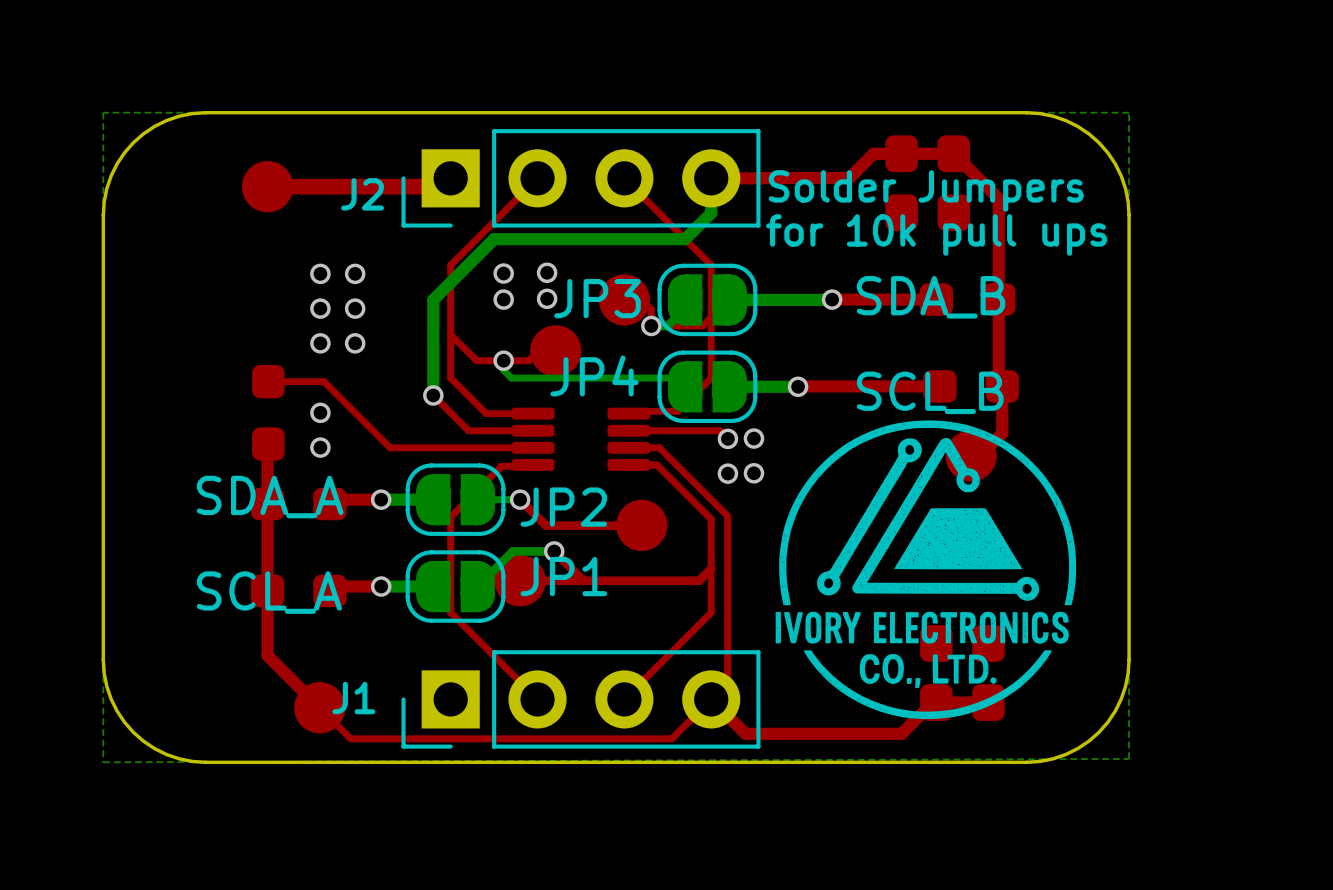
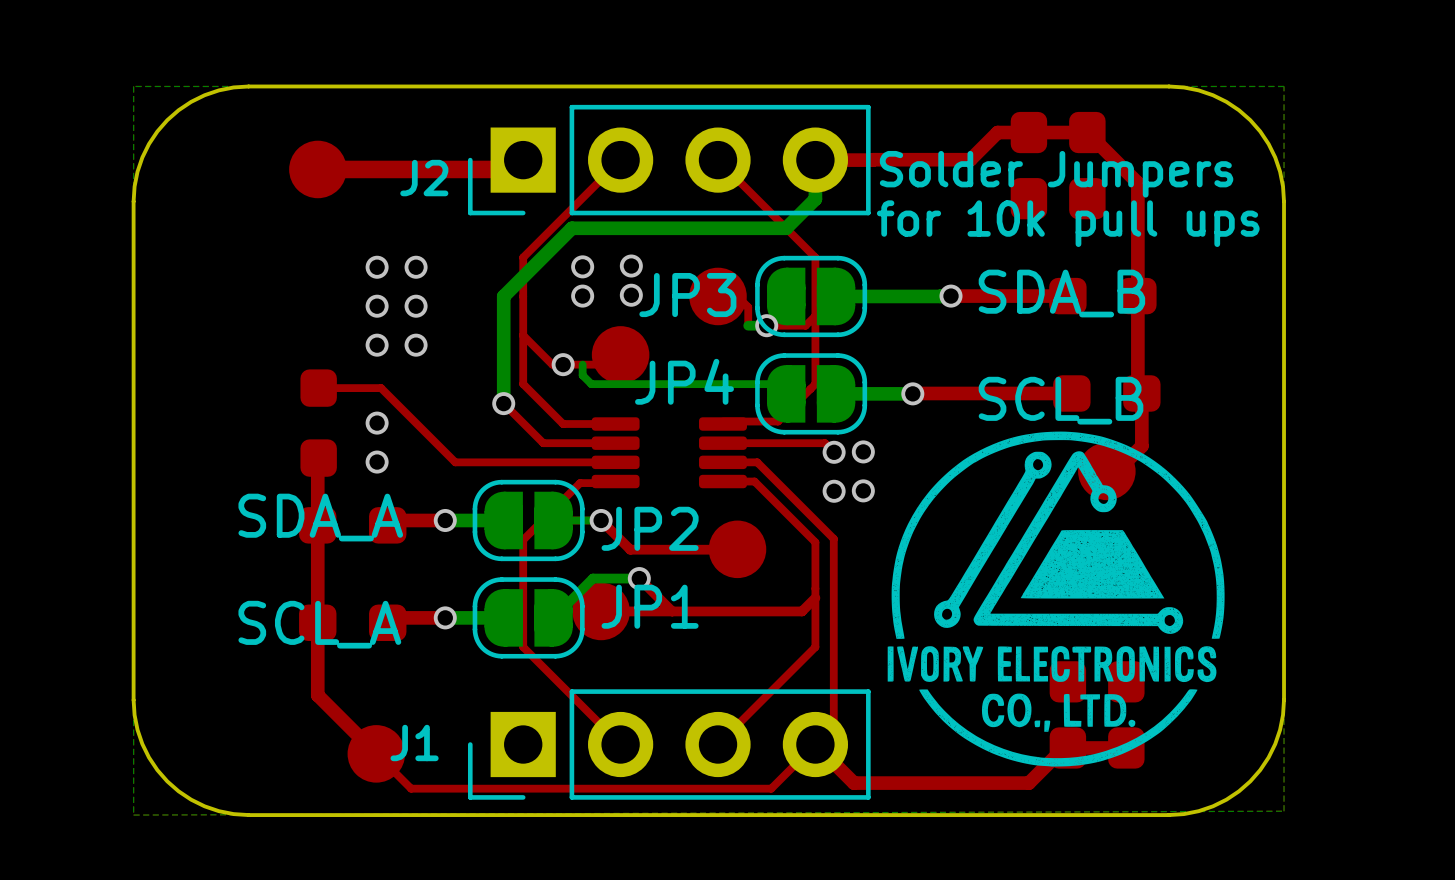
via position: (651, 325) -> (766, 325)
part position: (555, 350) -> (620, 354)
via position: (503, 360) -> (563, 364)

